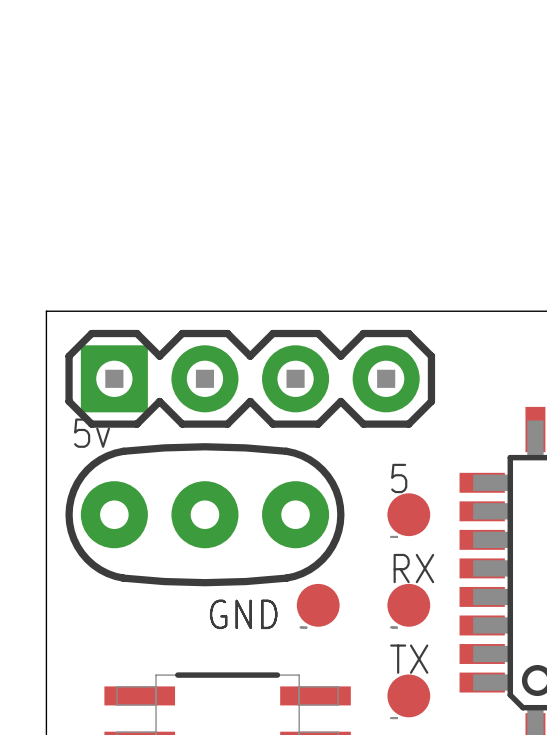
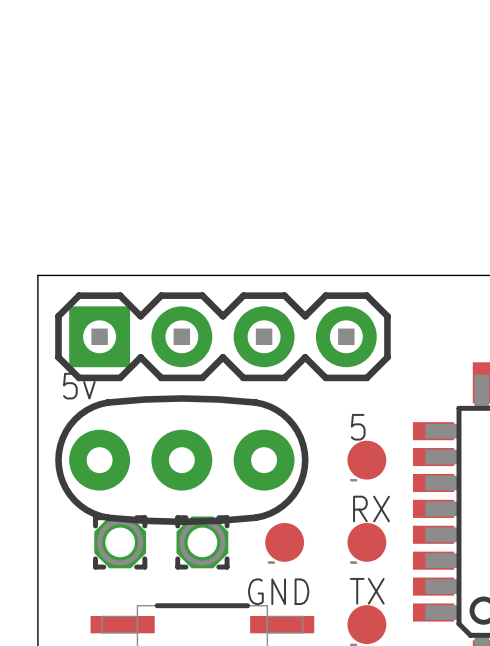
part: none -> (120, 542)
part: none -> (202, 542)
text position: GND (243, 614) -> GND (278, 591)

